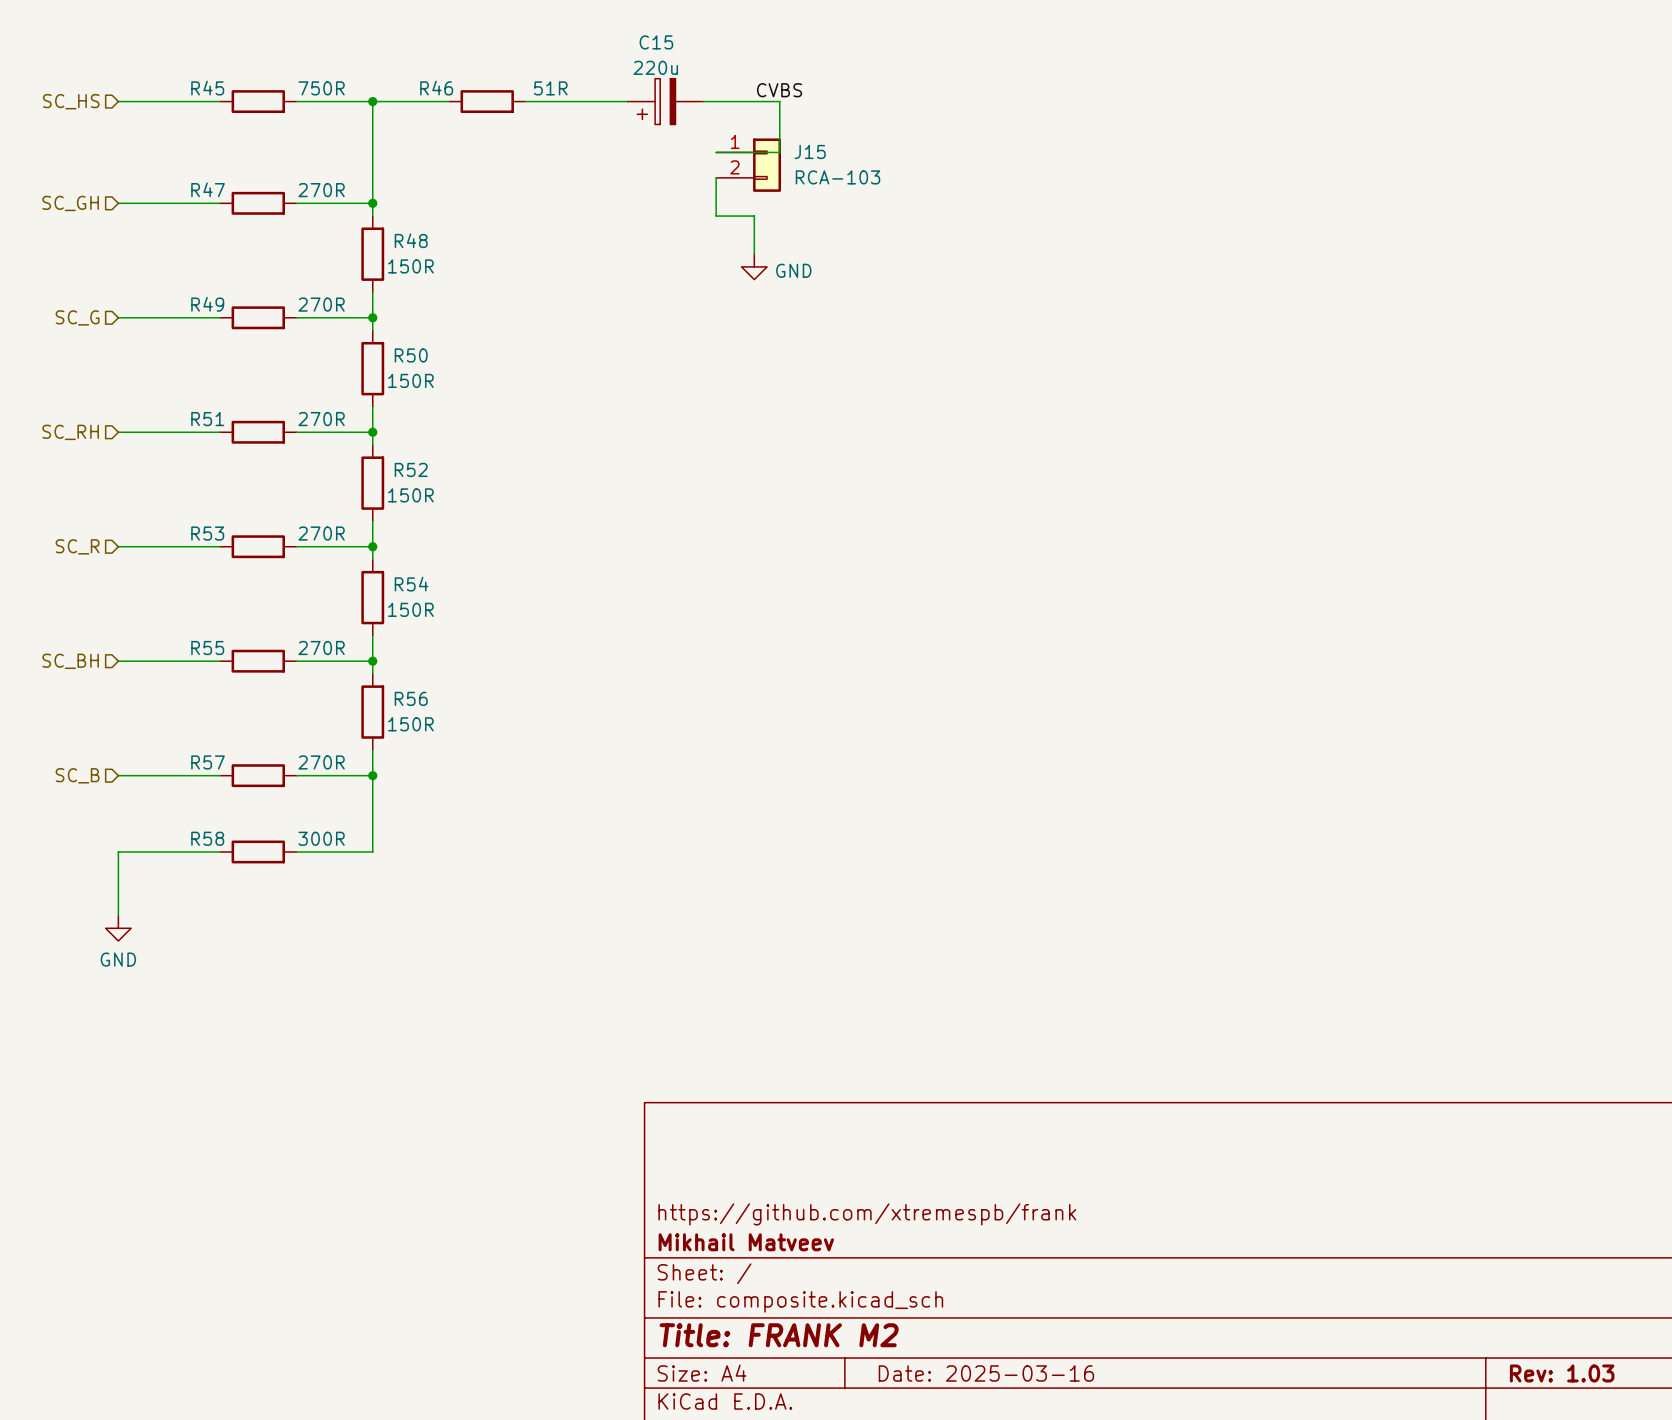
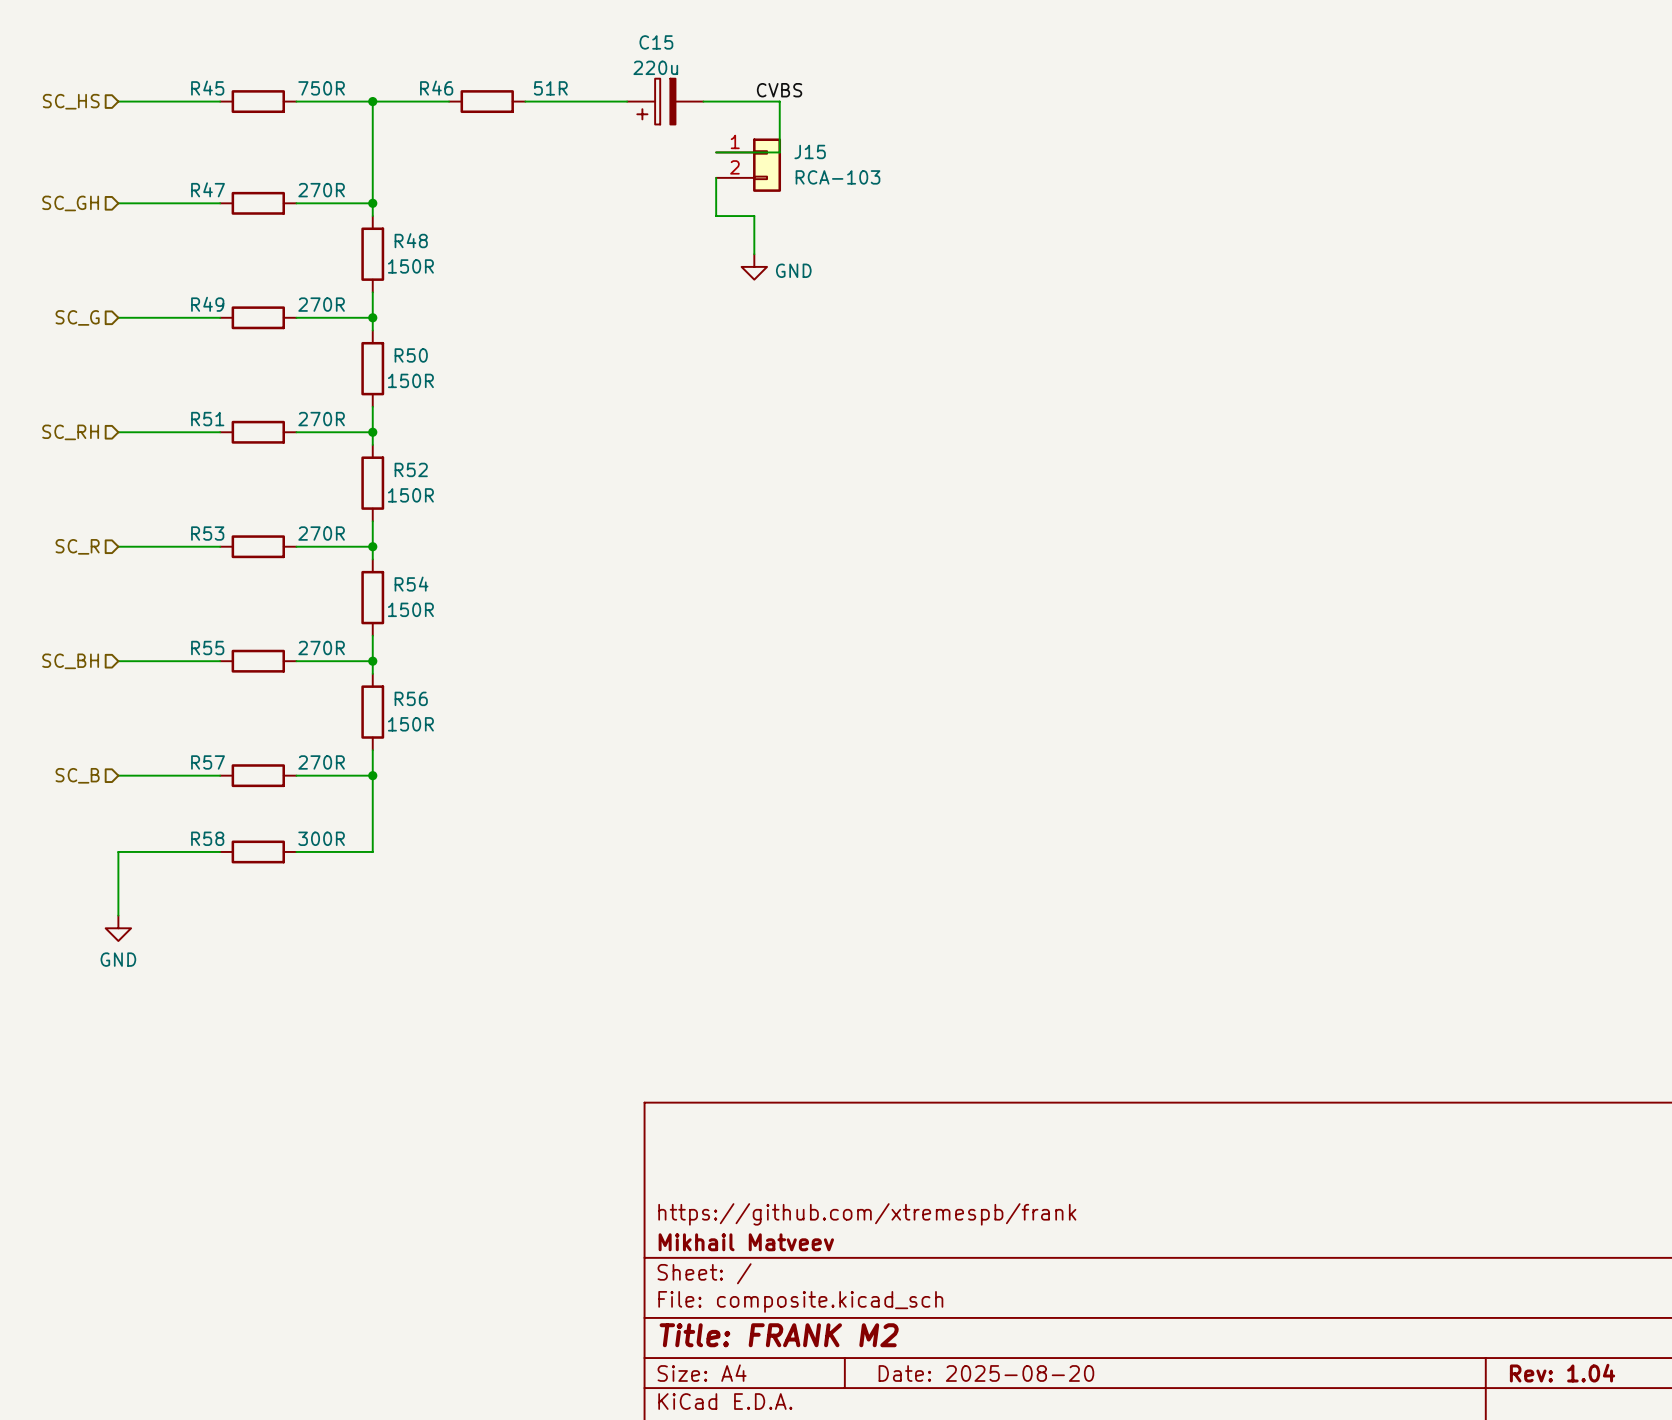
title block: Date: 2025-03-16 (986, 1373) -> Date: 2025-08-20 (986, 1373)
title block: Rev: 1.03 (1562, 1373) -> Rev: 1.04 (1562, 1373)

